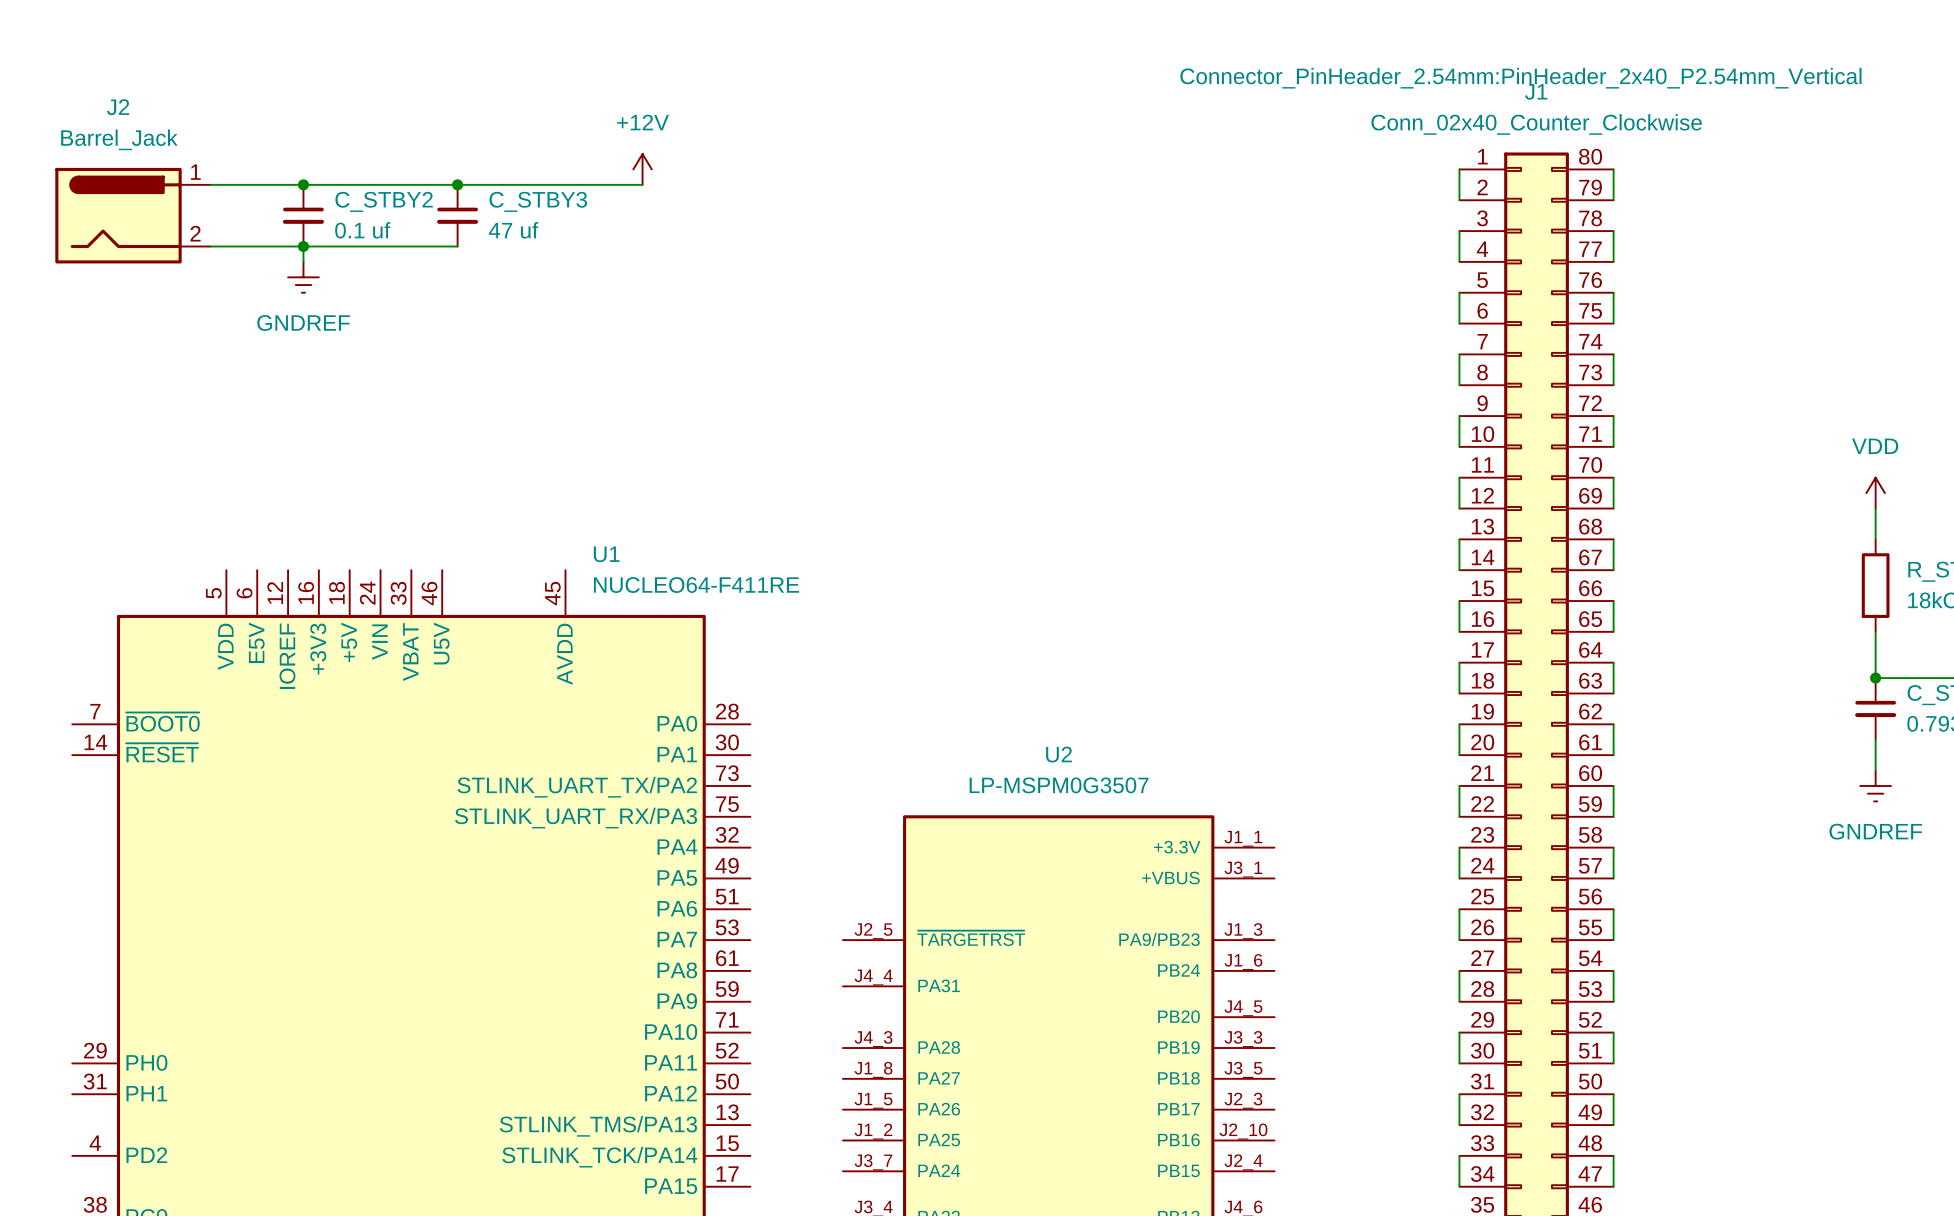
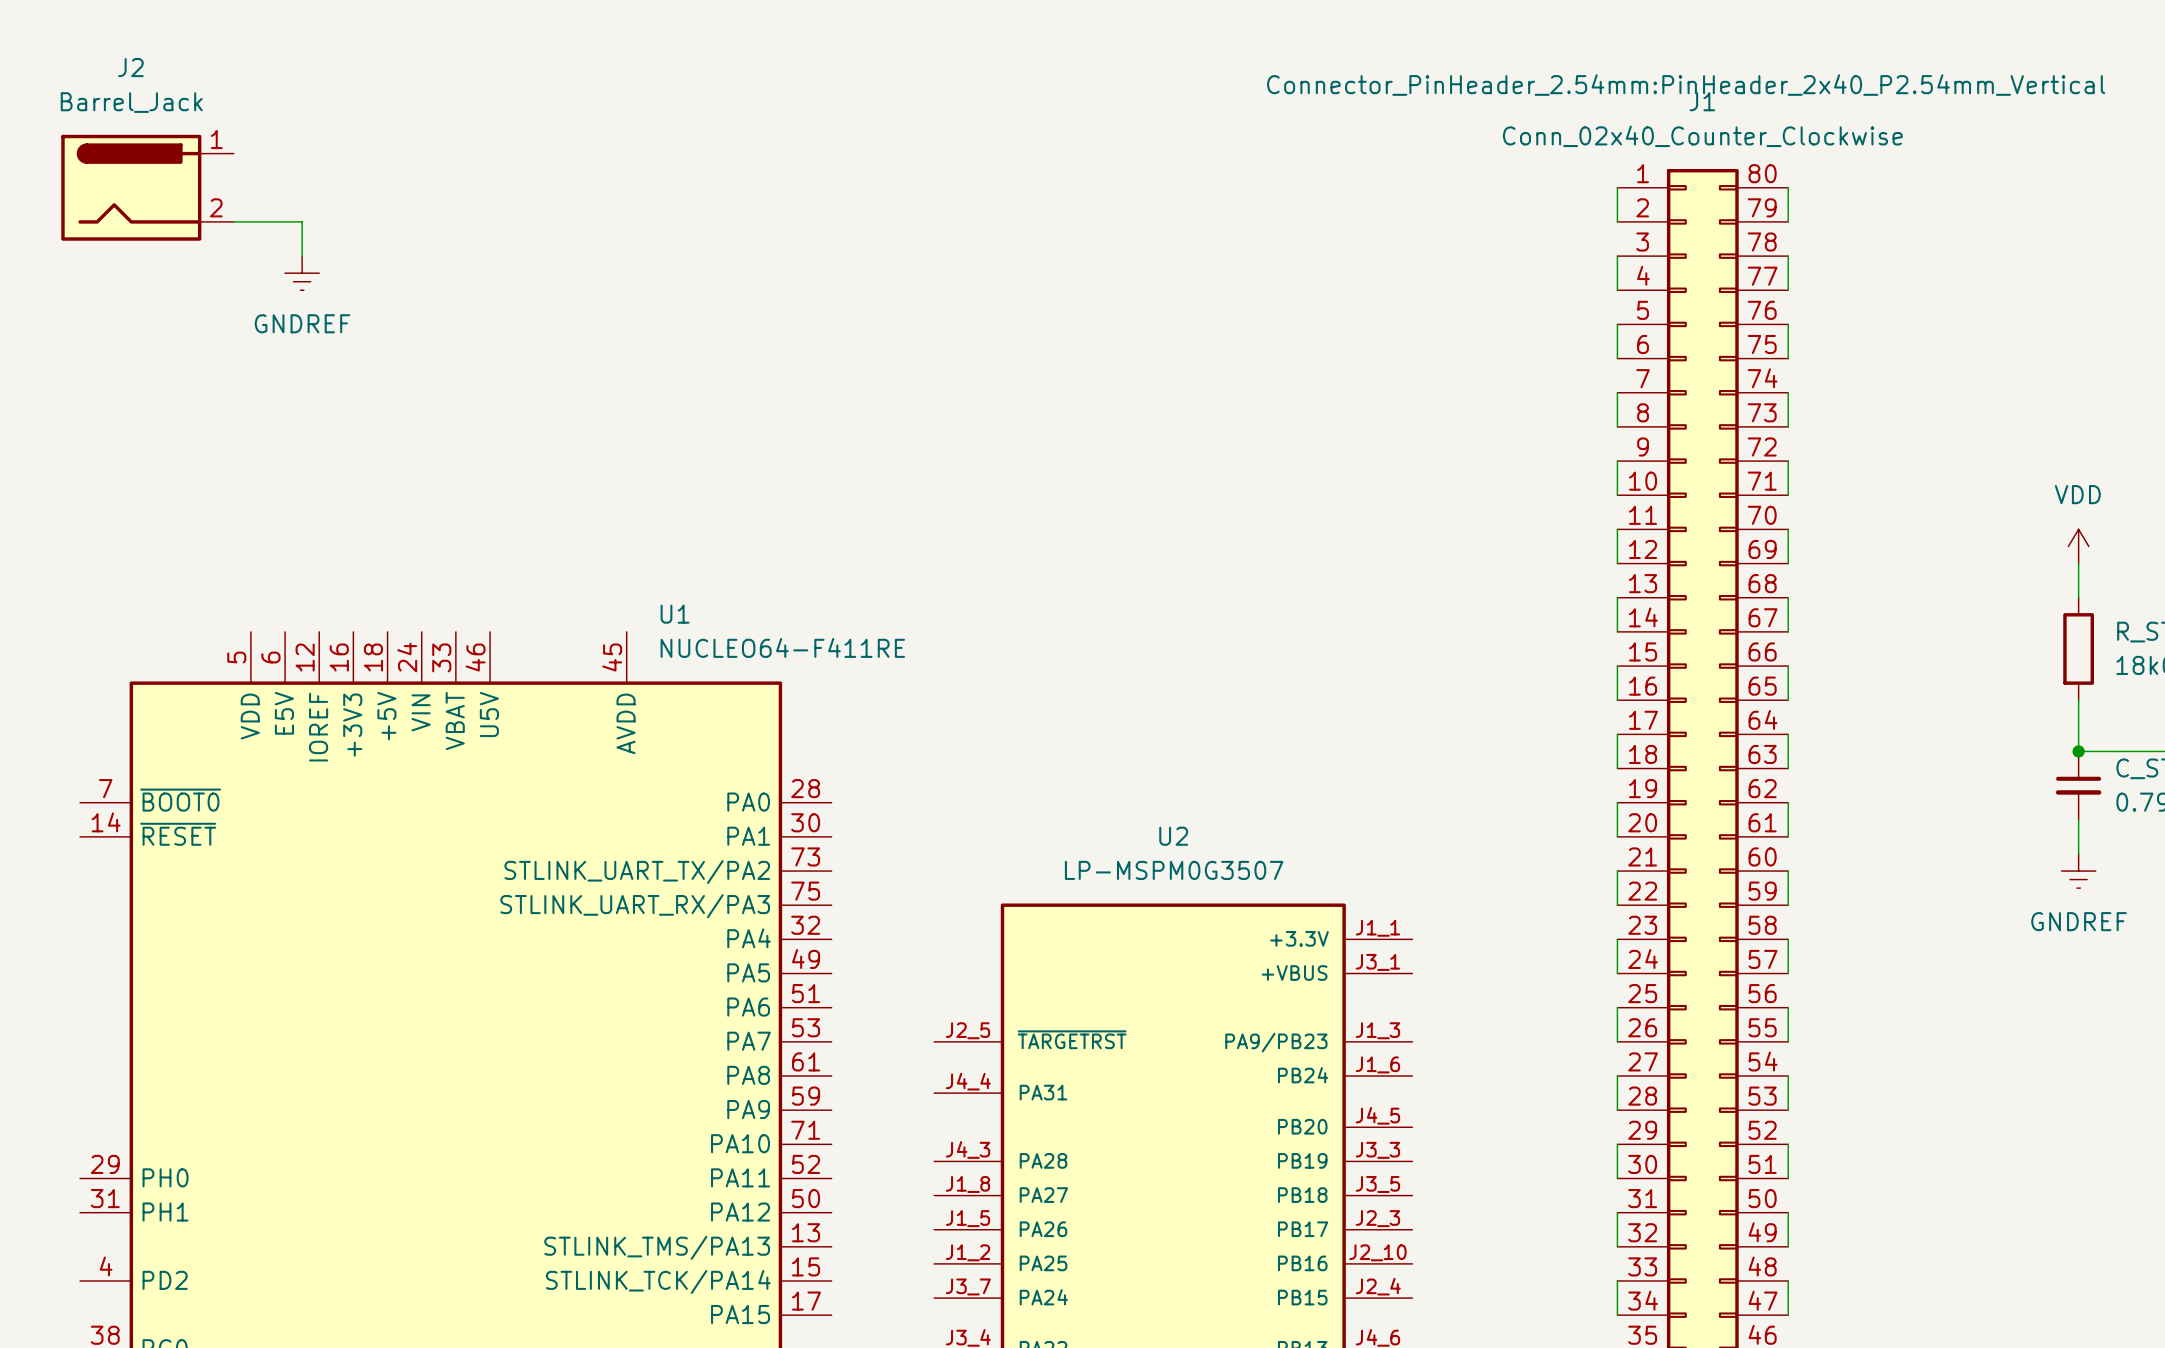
power symbol: +12V (642, 169) -> none
wire: (210, 184) (642, 184) -> none
junction: (303, 184) -> none
junction: (457, 184) -> none
wire: none -> (233, 221) (302, 221) (302, 256)
J2 position: (133, 215) -> (147, 187)
C_STBY2: 0.1 uf (303, 215) -> none
C_STBY3: 47 uf (457, 215) -> none
wire: (210, 246) (457, 246) -> none
wire: (303, 246) (303, 261) -> none
junction: (303, 246) -> none
power symbol position: GNDREF (303, 277) -> GNDREF (302, 273)

